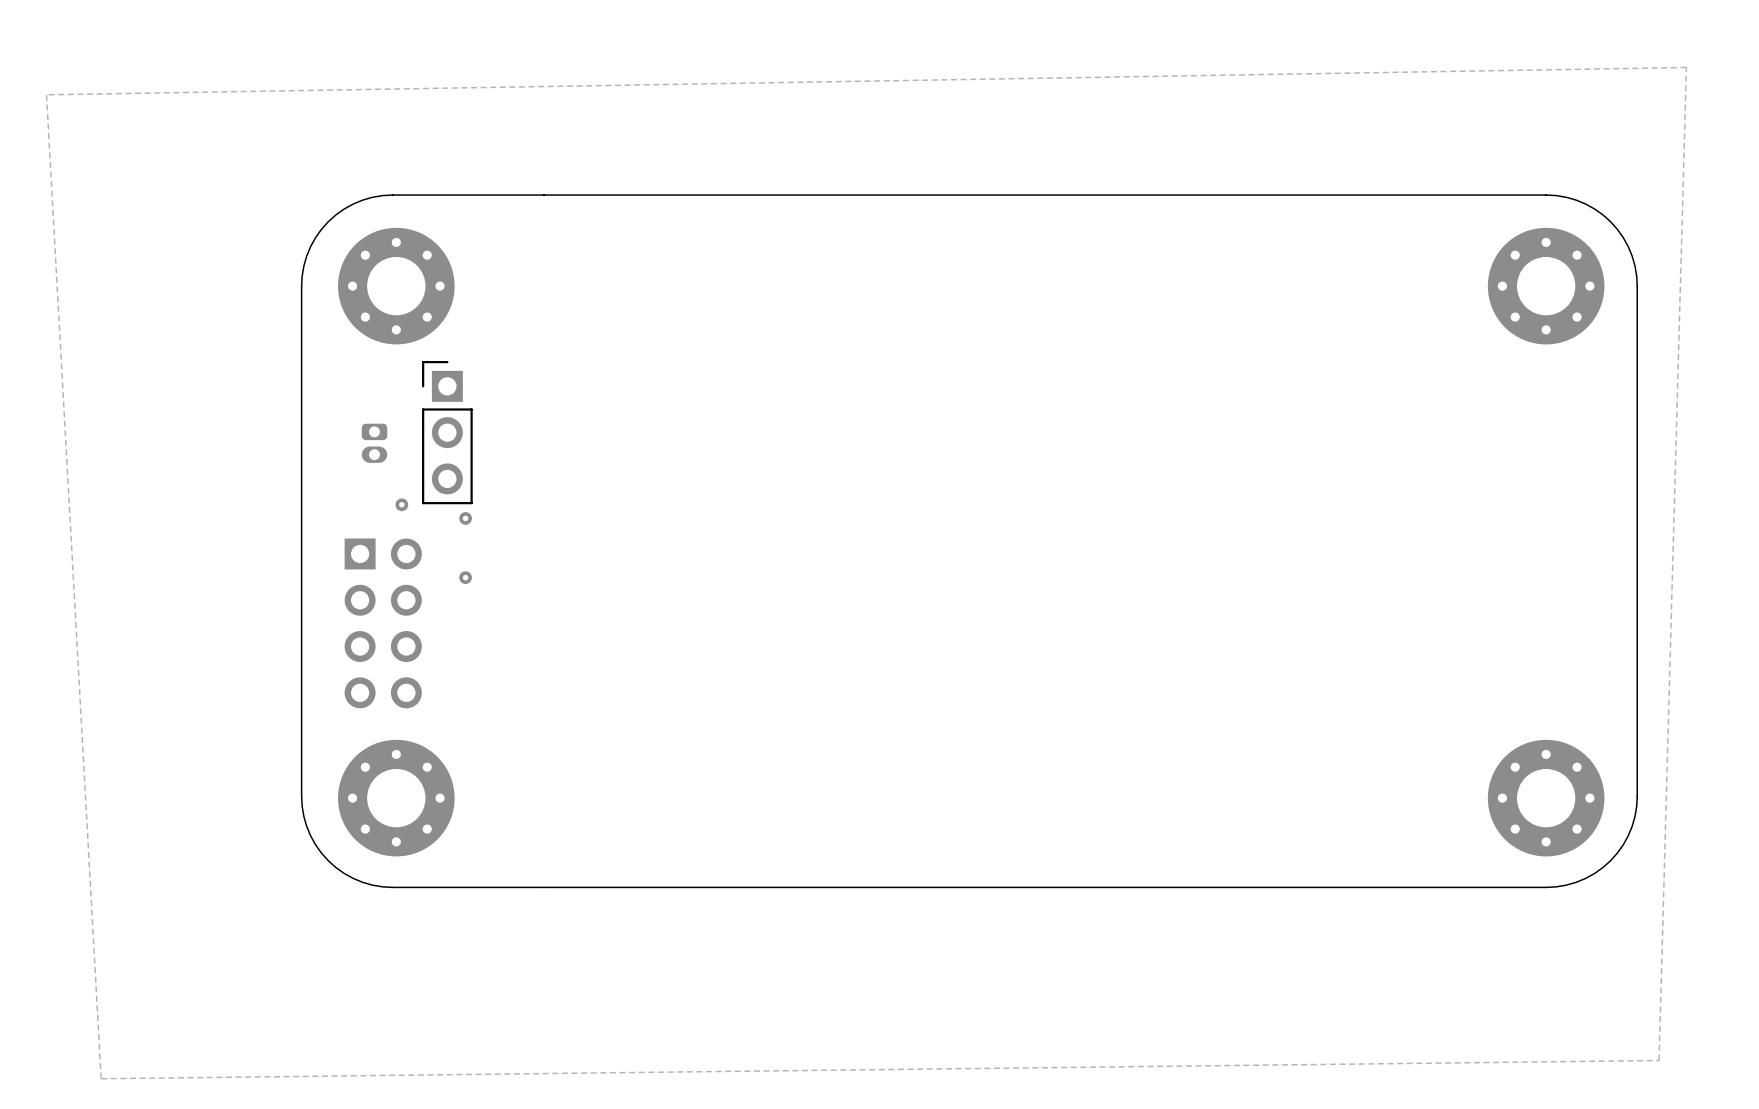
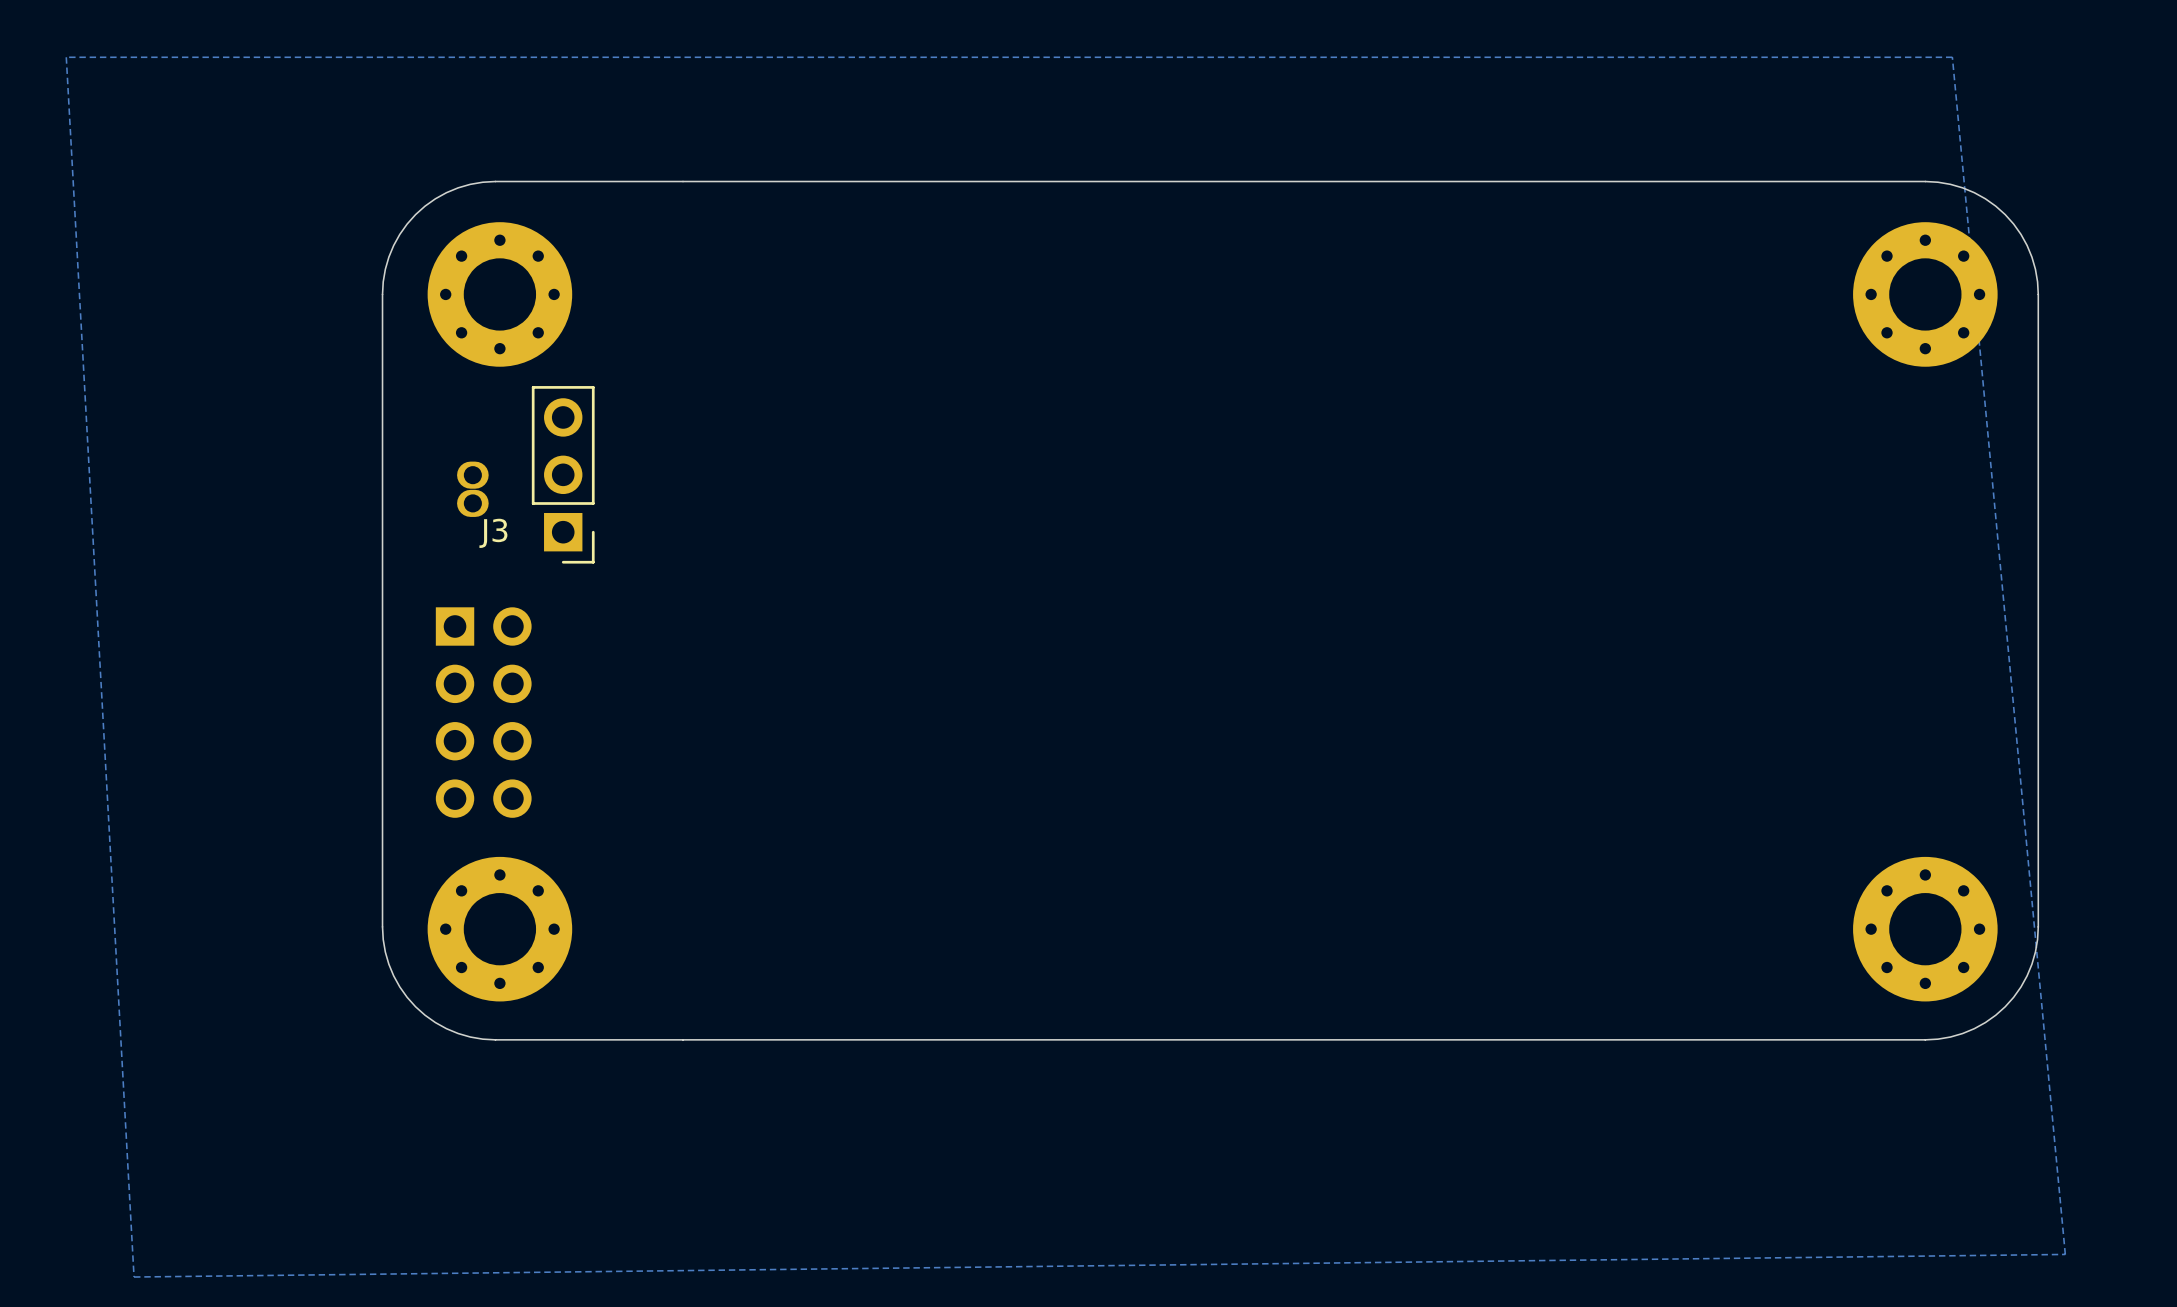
zone outline: (46, 94) (1686, 67) (1659, 1060) -> (66, 57) (1952, 57) (2065, 1254)
part footprint: [361, 423, 388, 463] -> [457, 461, 489, 517]
J3: none -> (563, 474)
part: (447, 432) -> none
via: (401, 504) -> none
via: (465, 518) -> none
via: (465, 577) -> none

